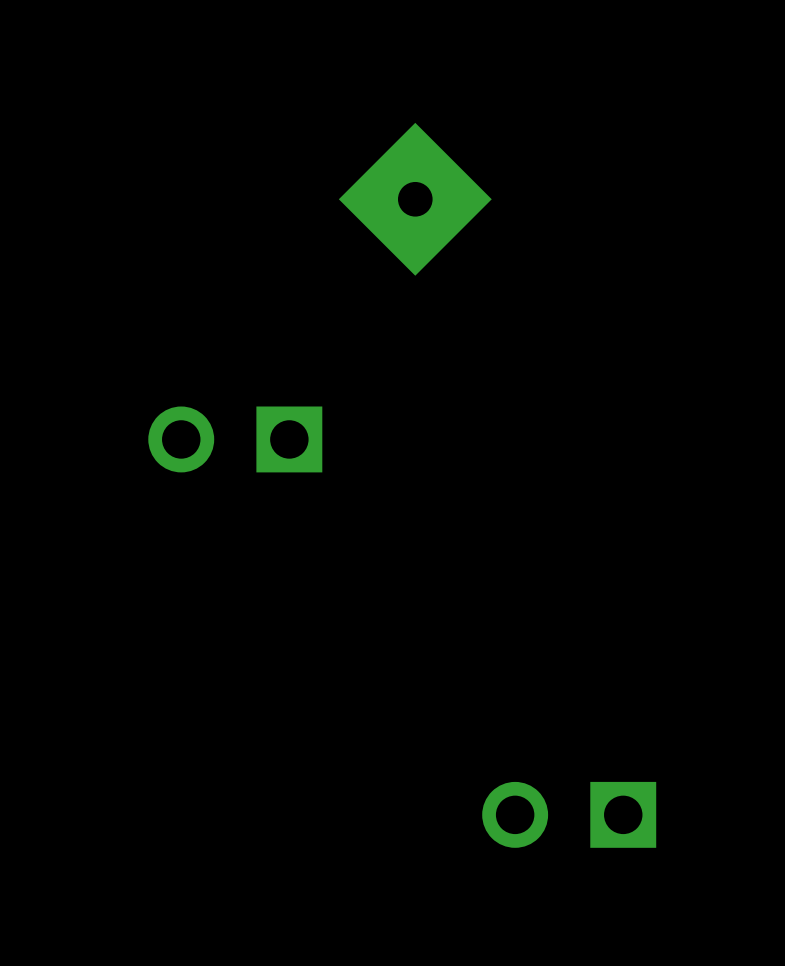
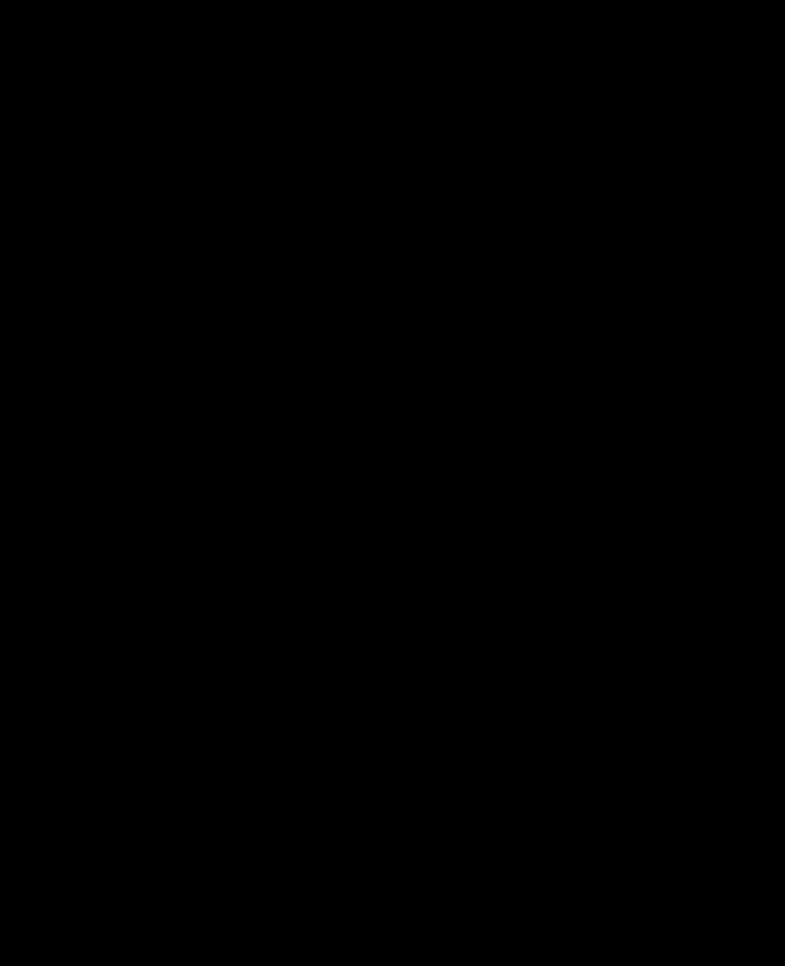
part: (415, 199) -> none
part: (235, 439) -> none
part: (569, 814) -> none

